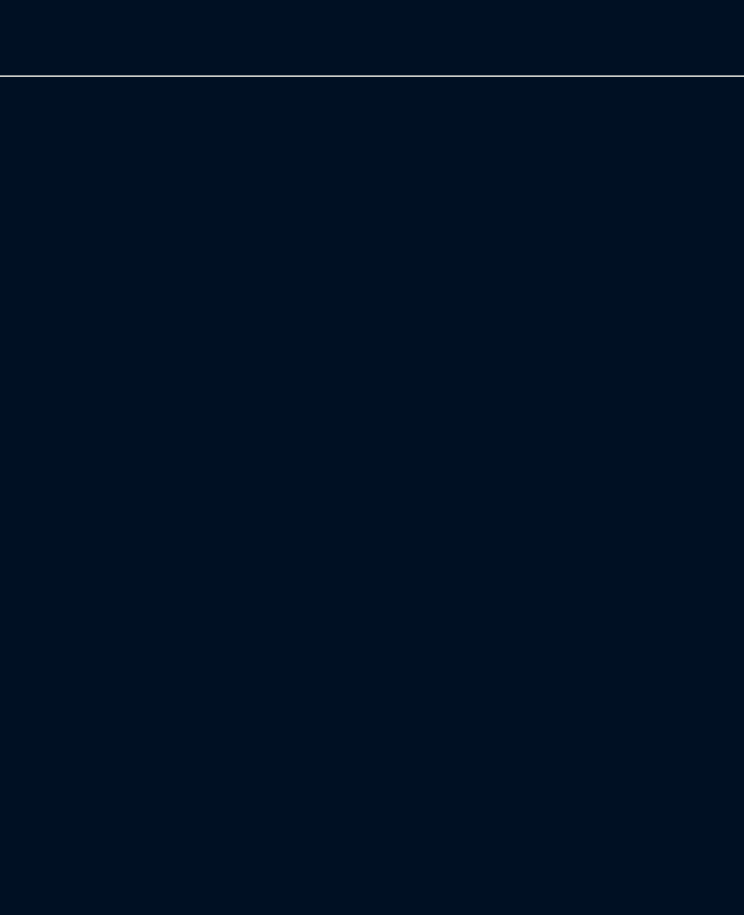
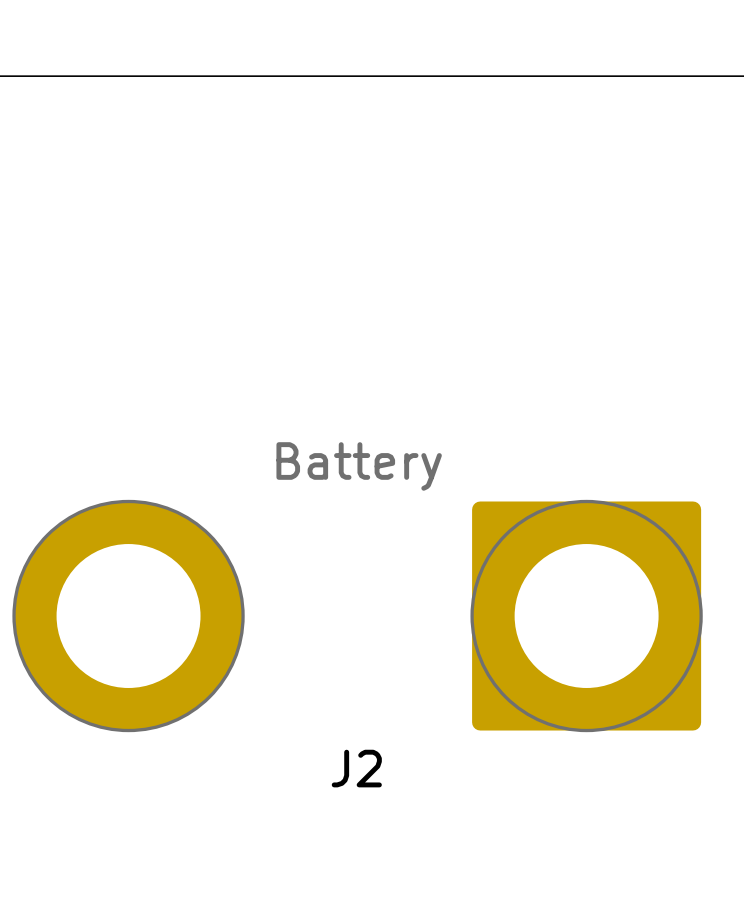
J2: none -> Battery (357, 616)

